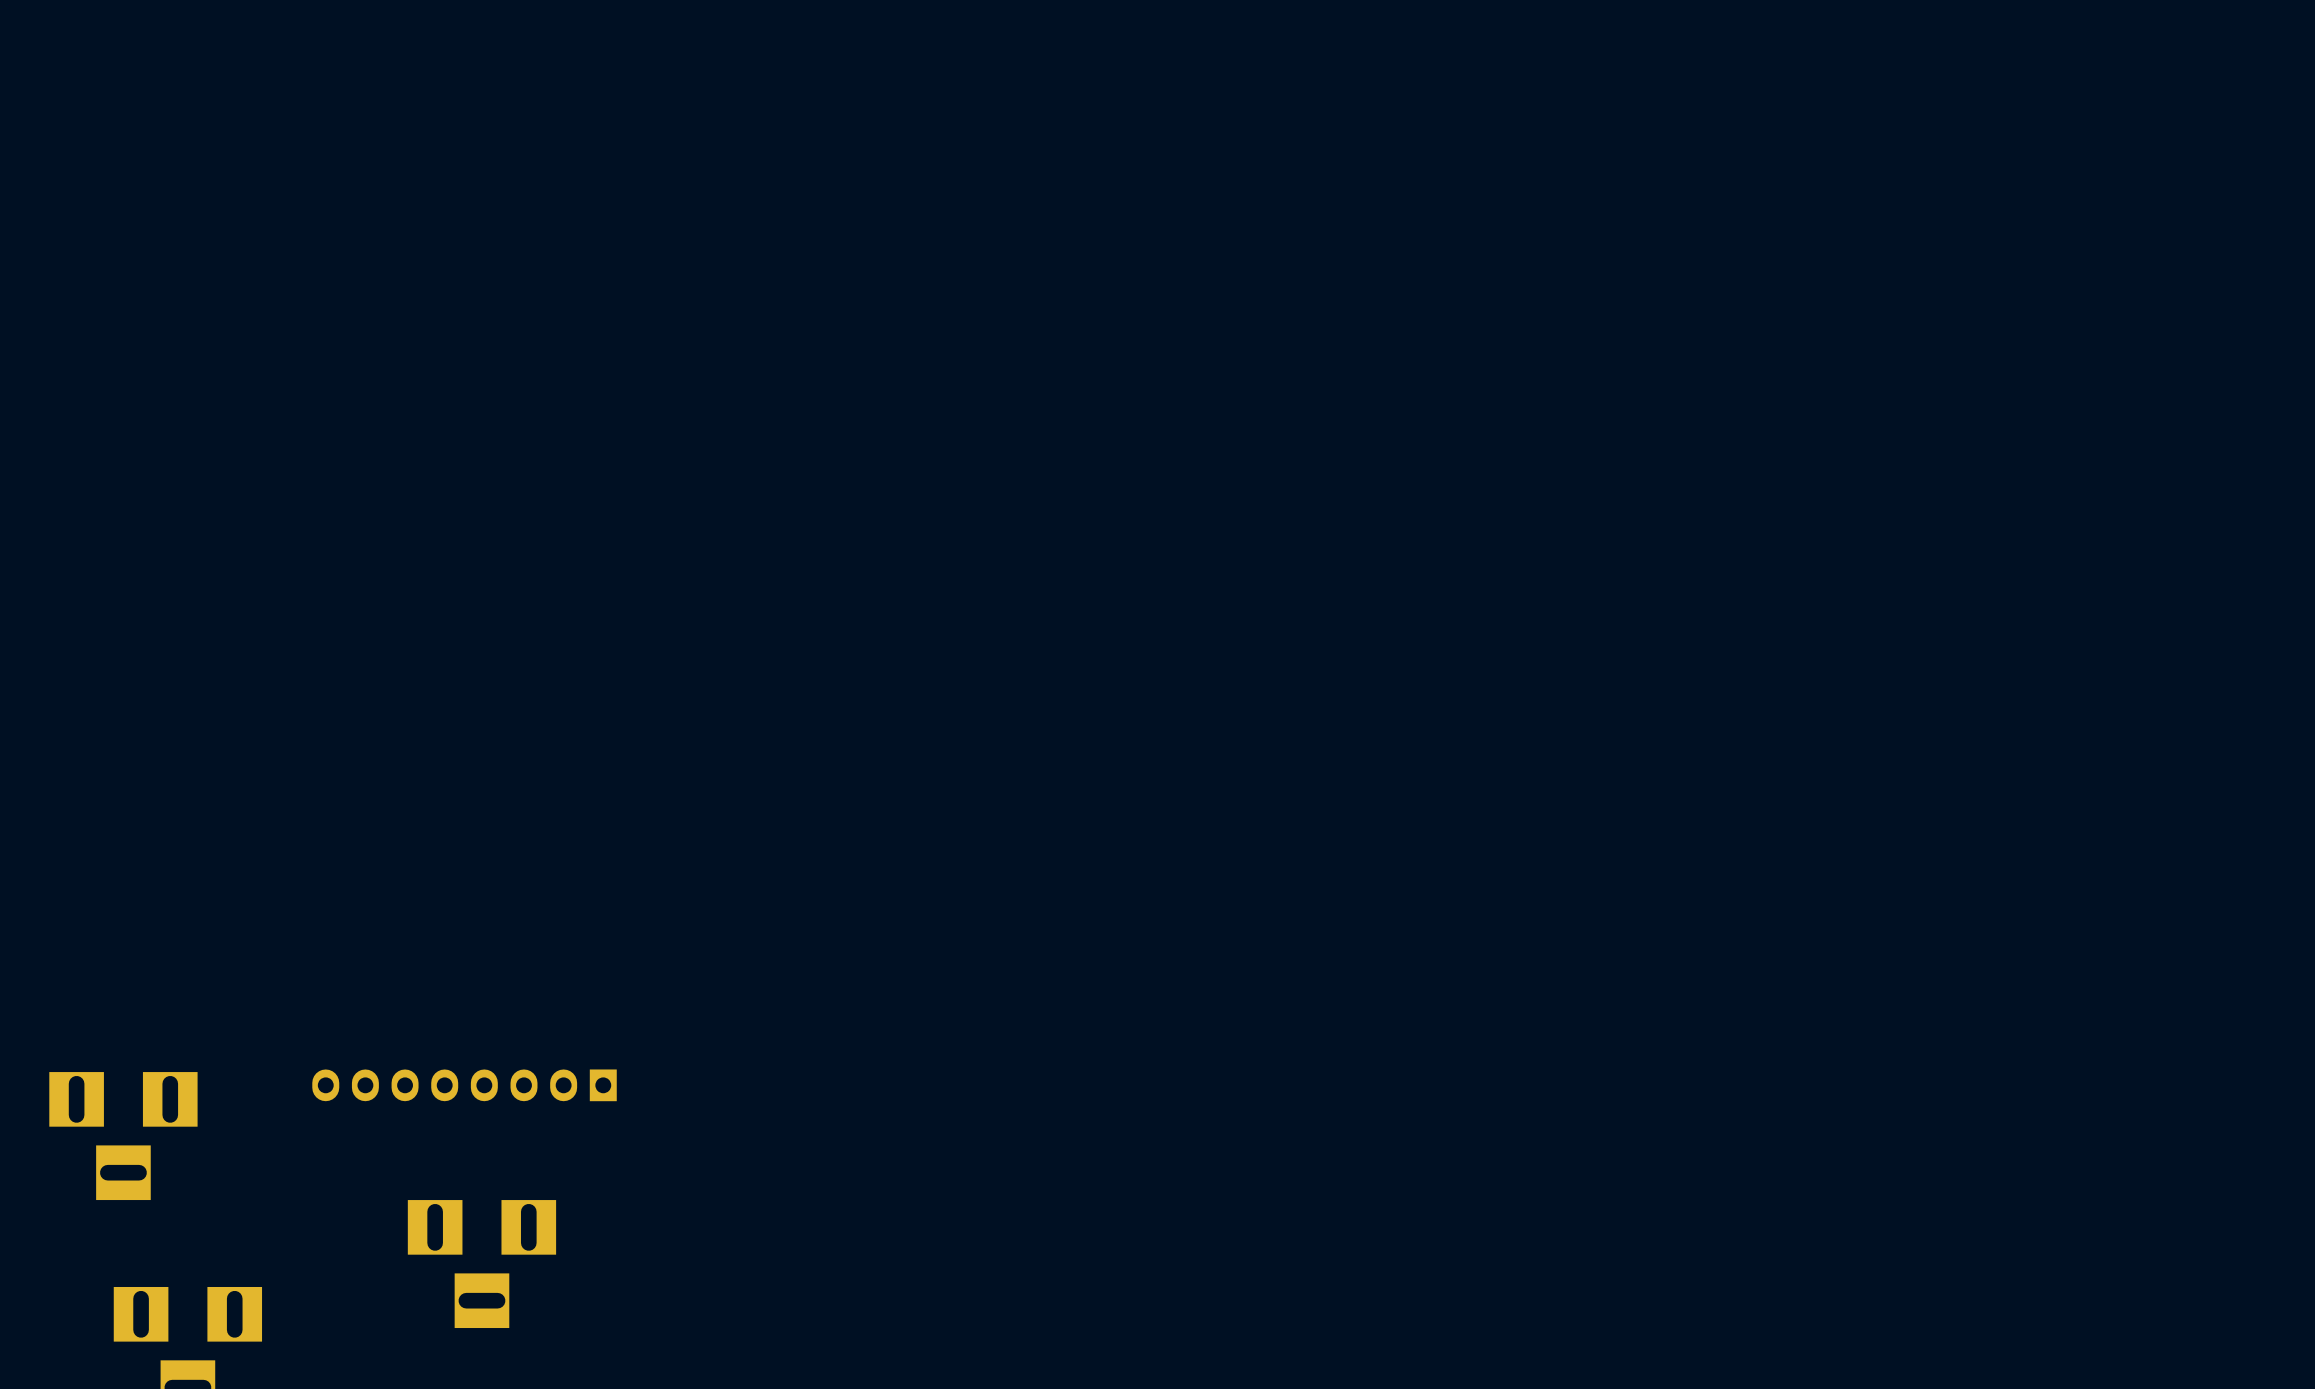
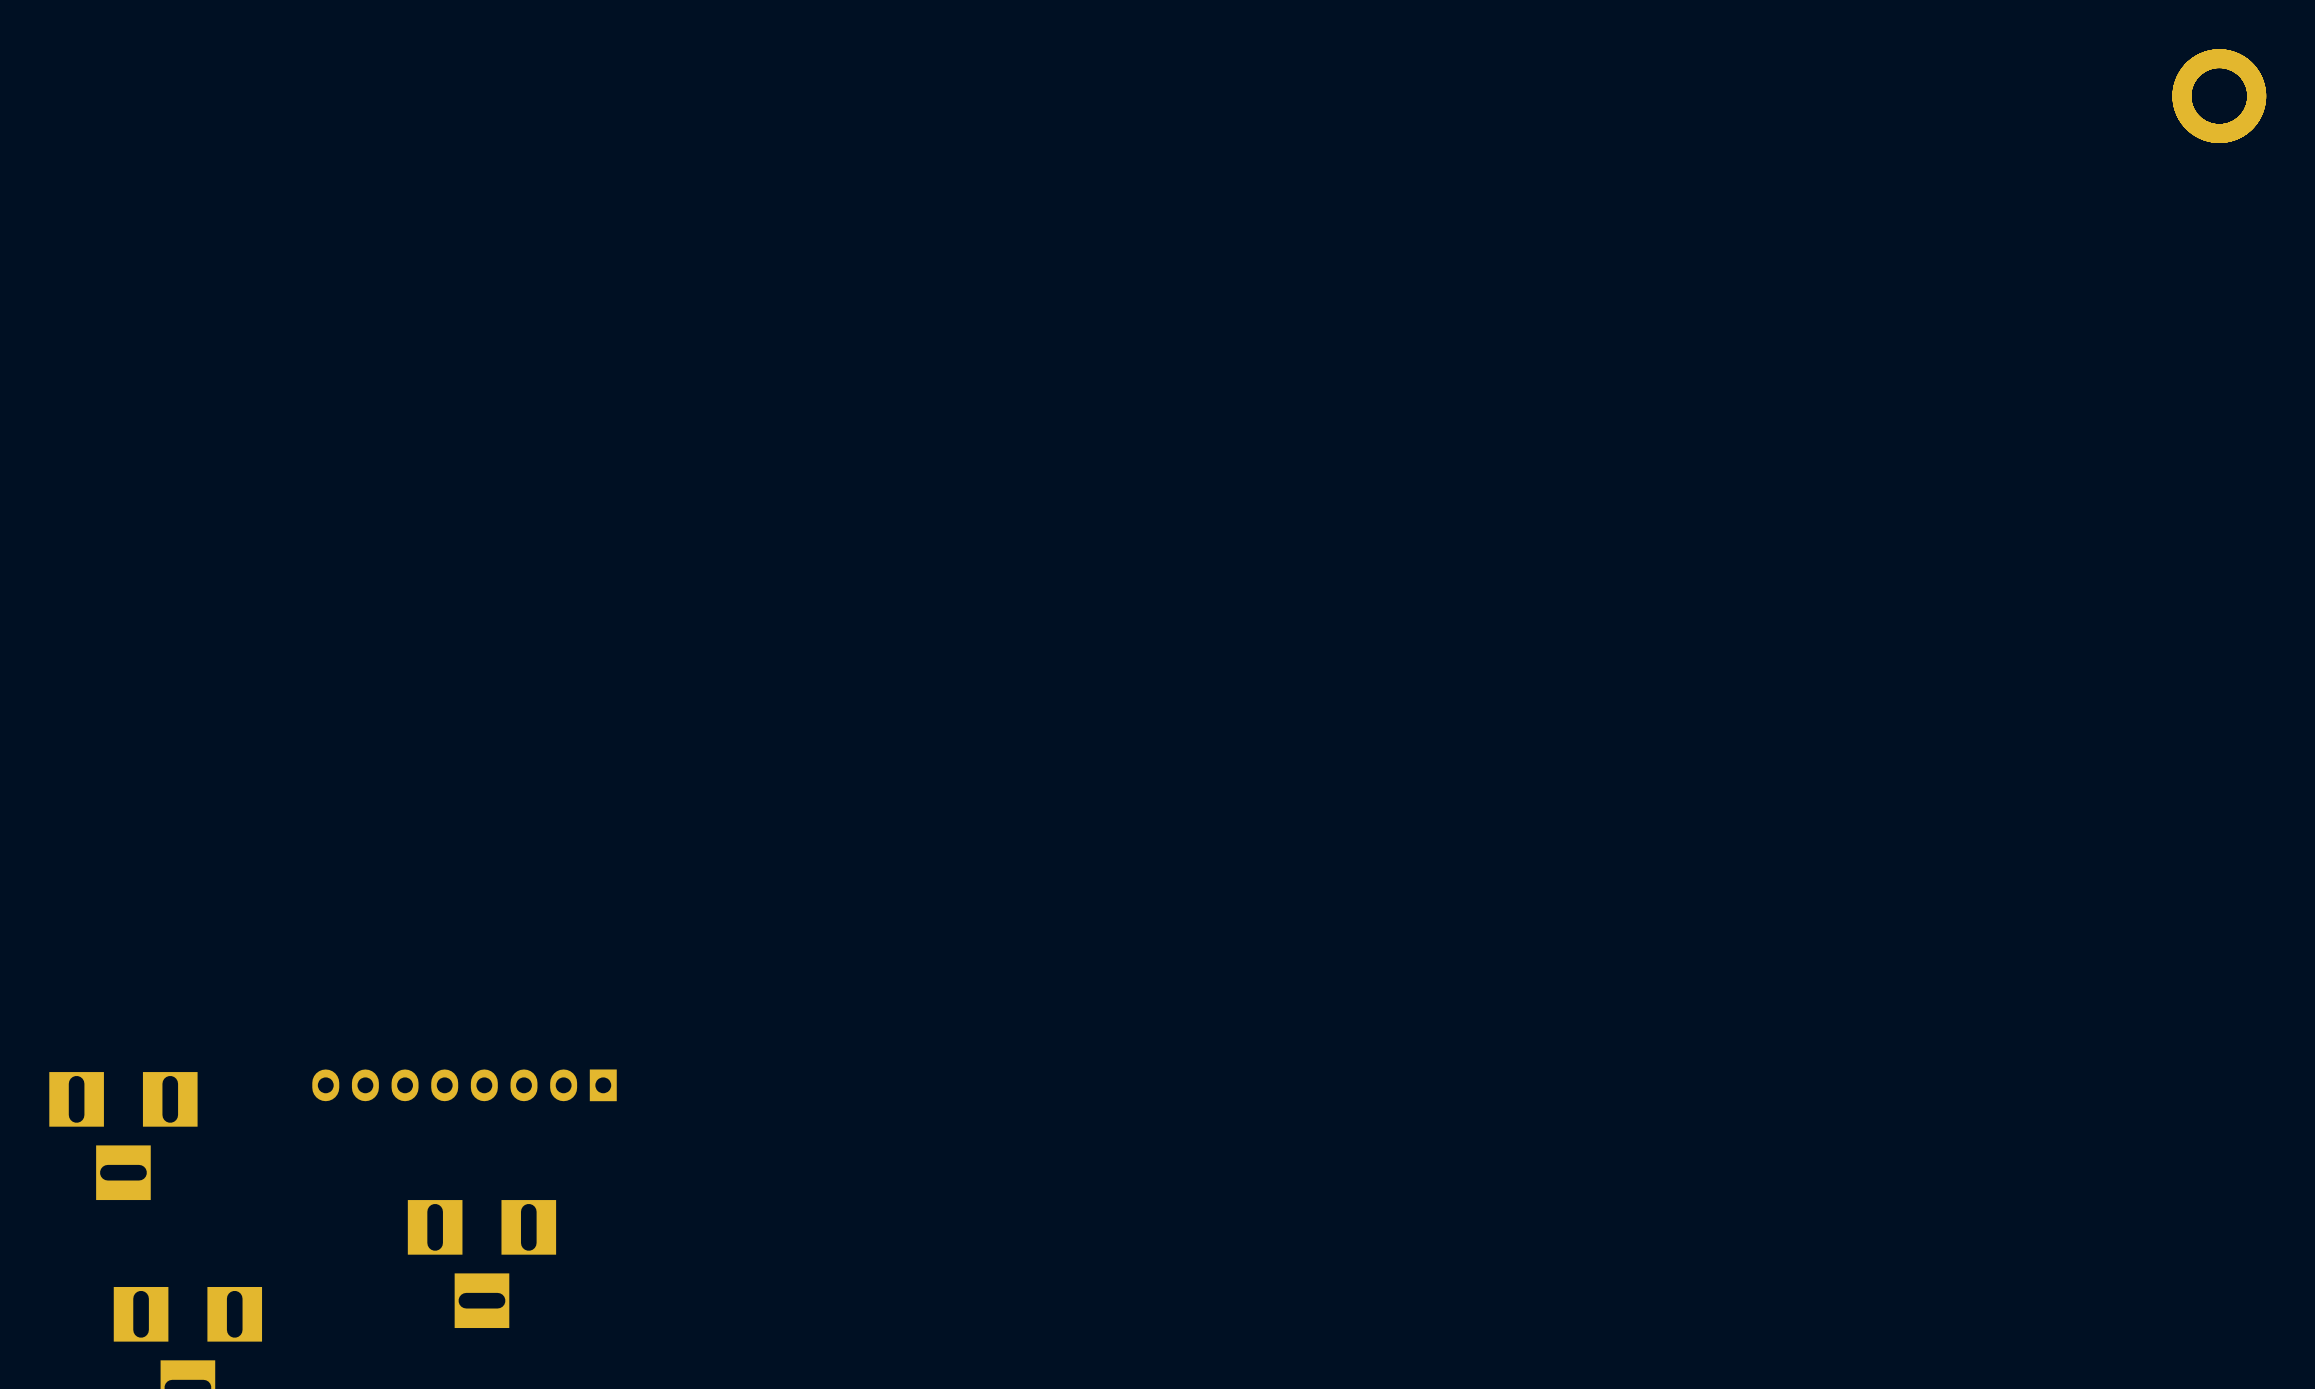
part: none -> (2219, 96)

